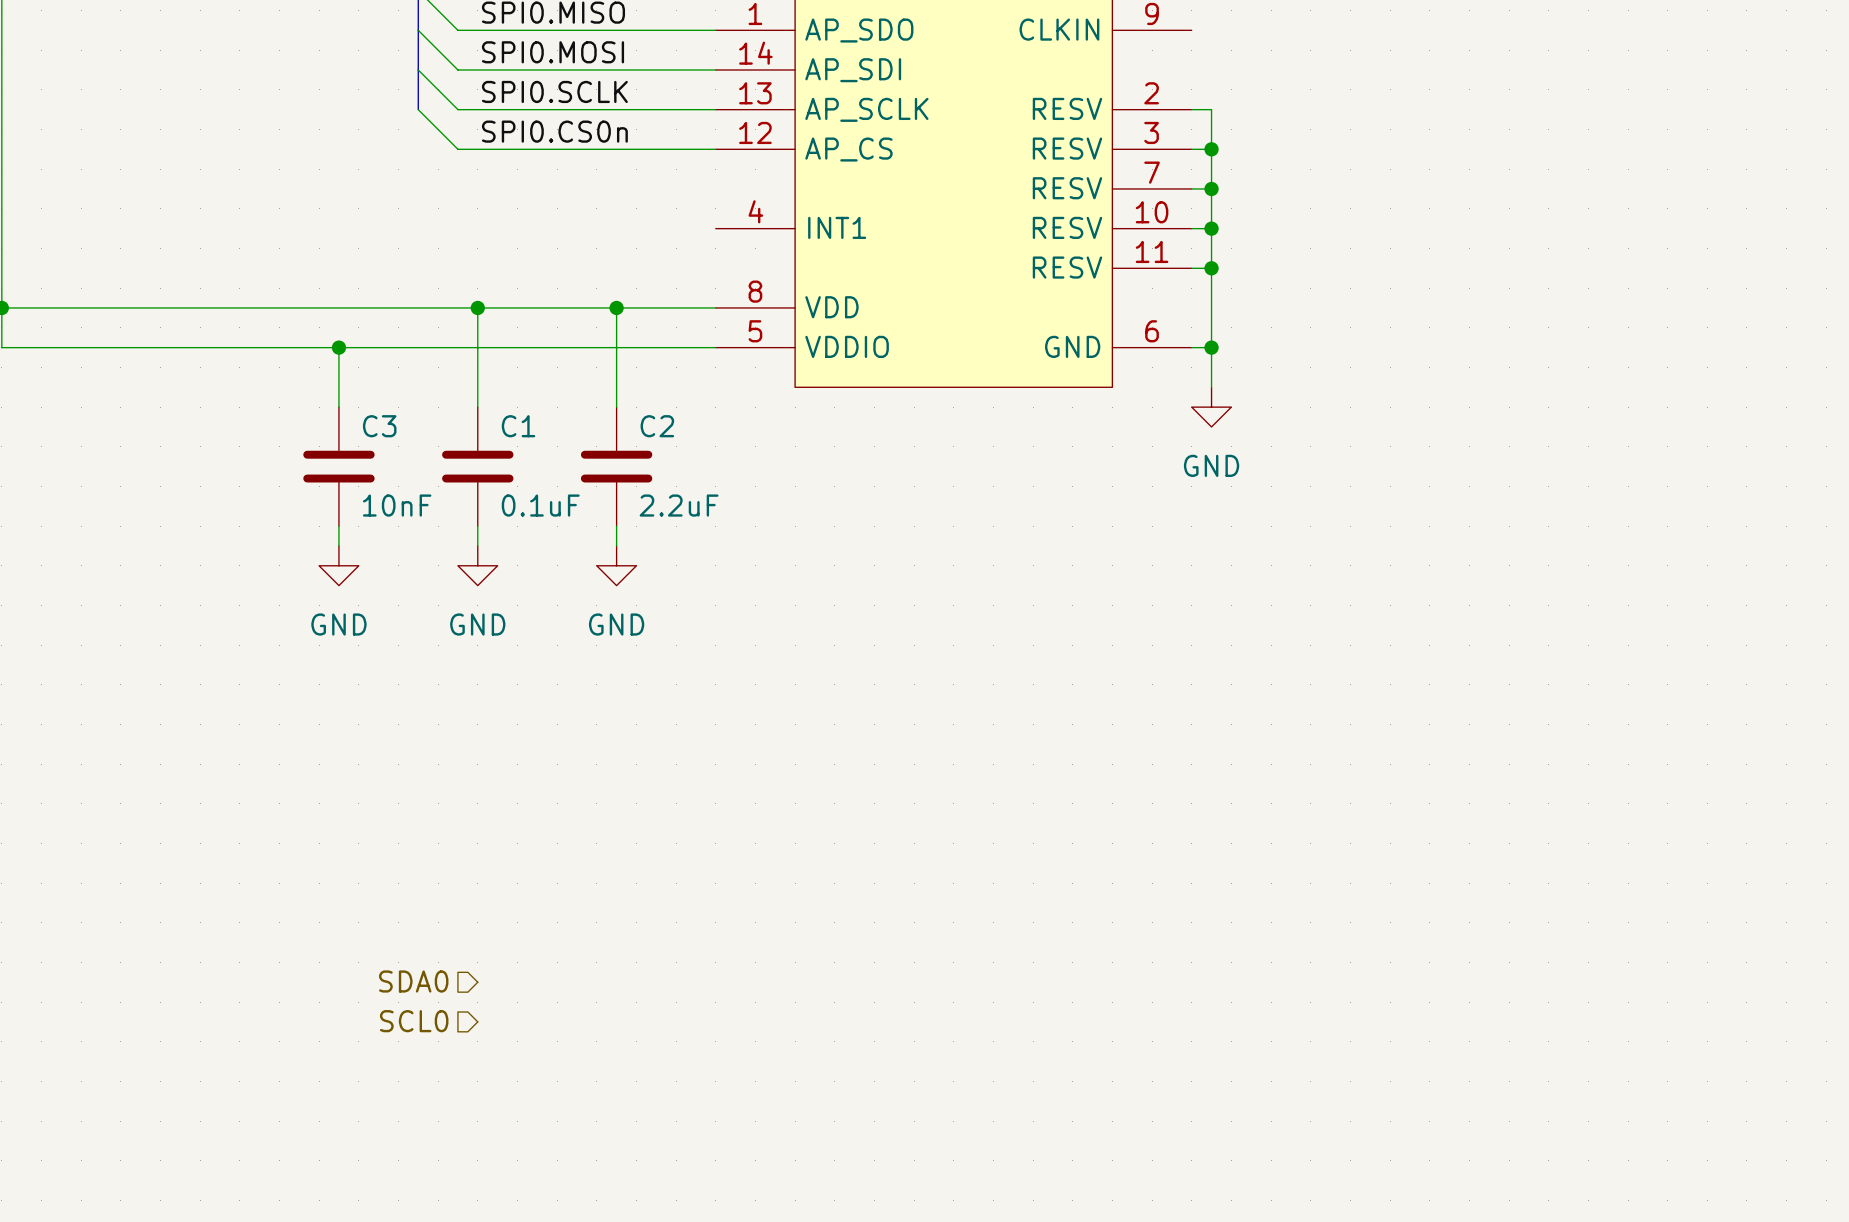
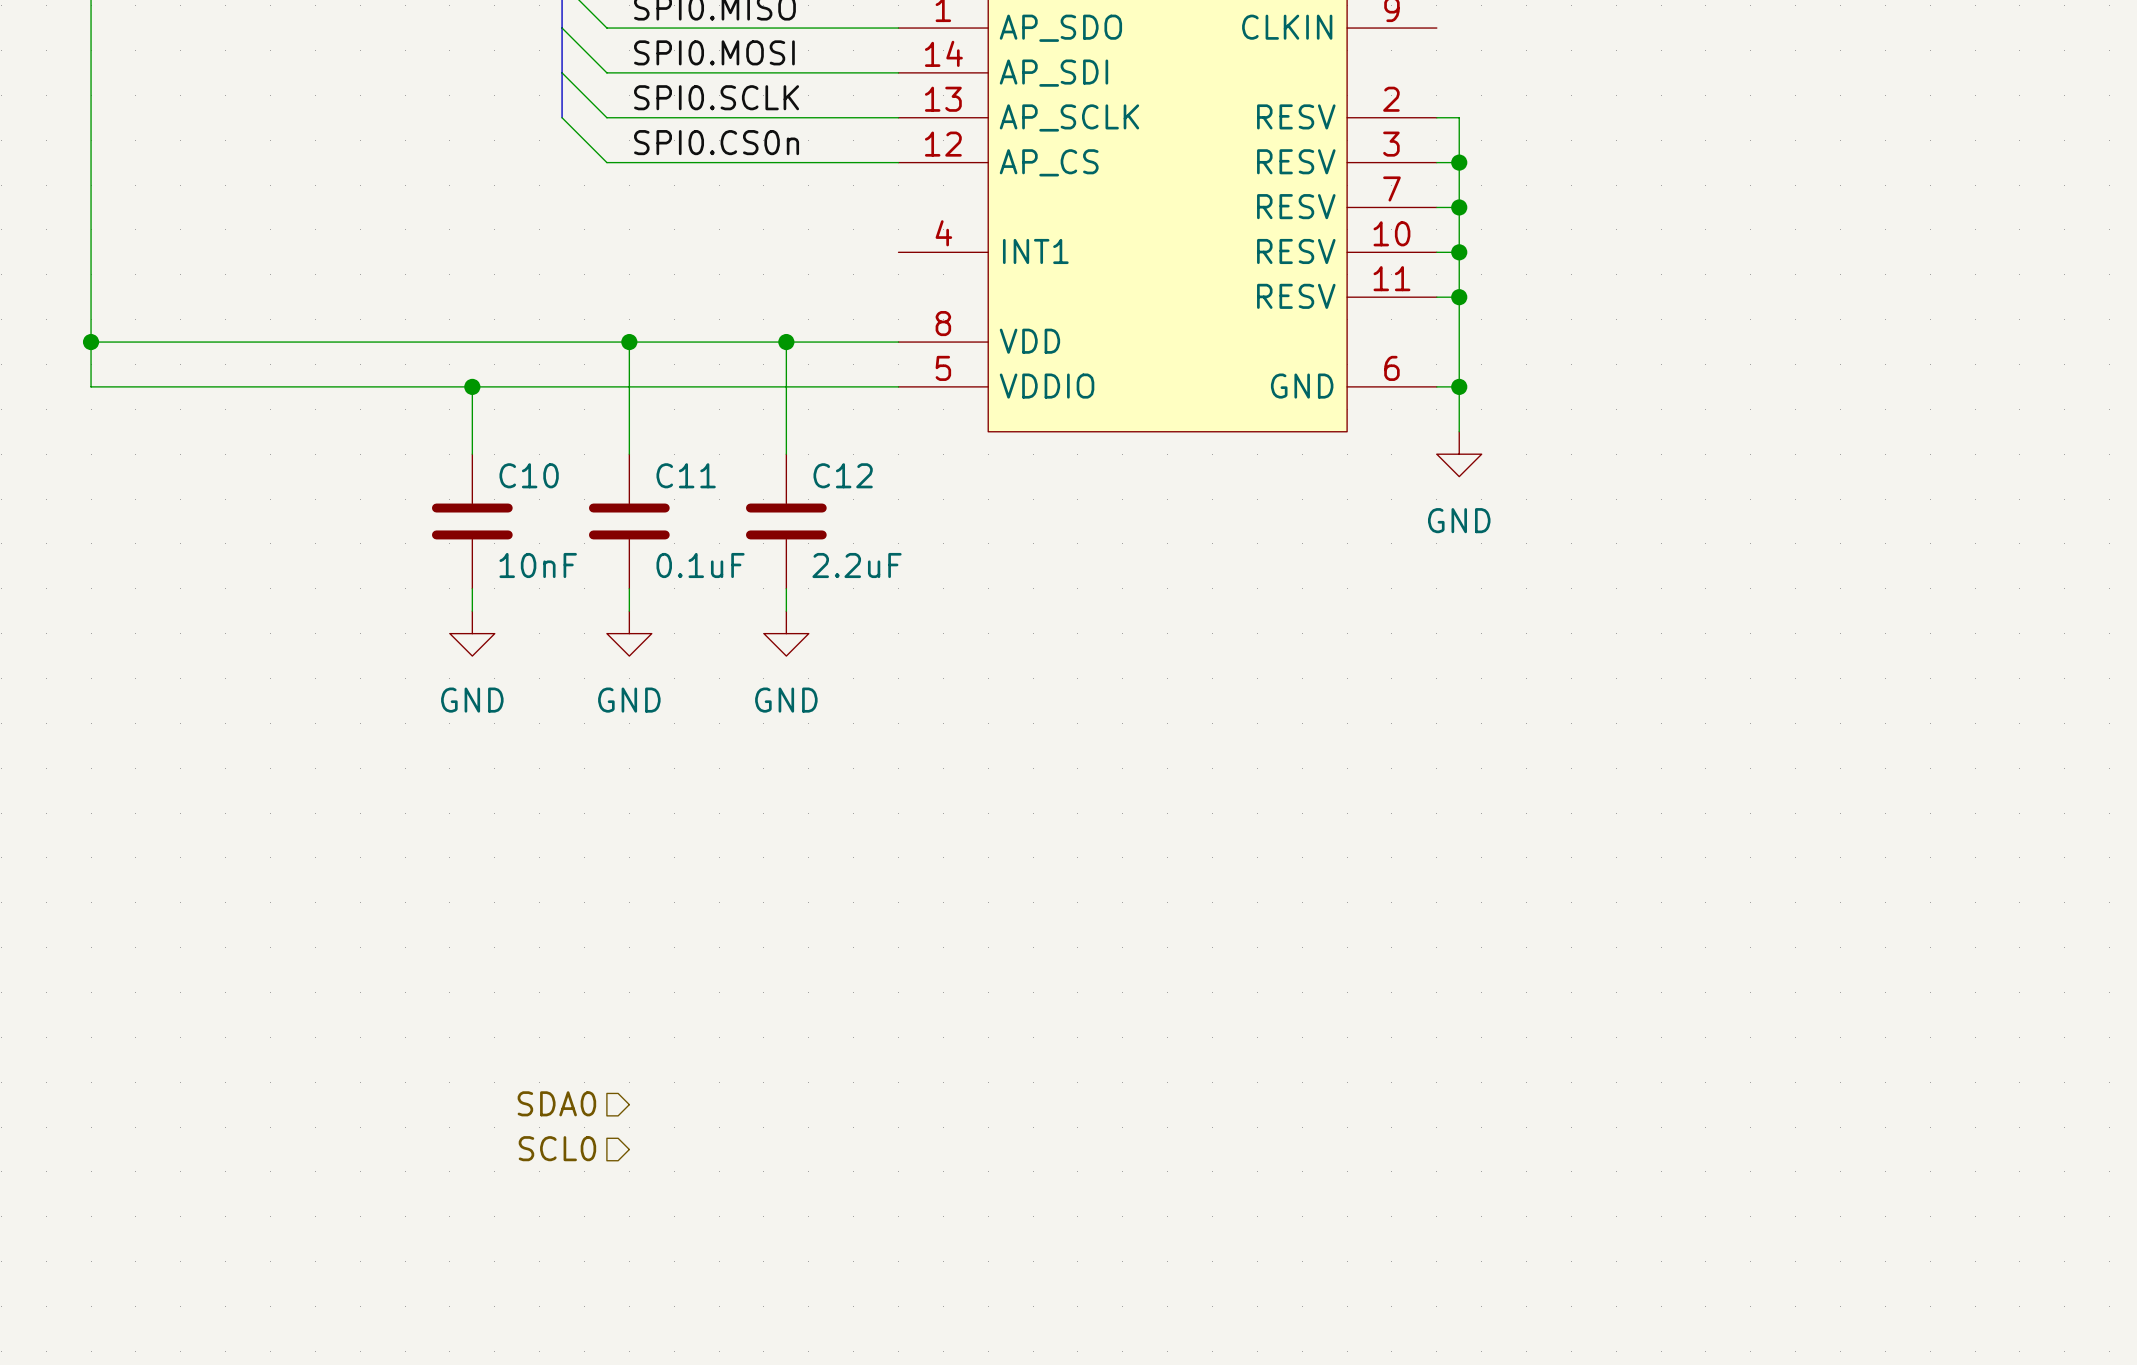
C3 name: C3 (379, 426) -> C10 (529, 475)
C1 name: C1 (518, 426) -> C11 (686, 475)
C2 name: C2 (657, 426) -> C12 (843, 475)

